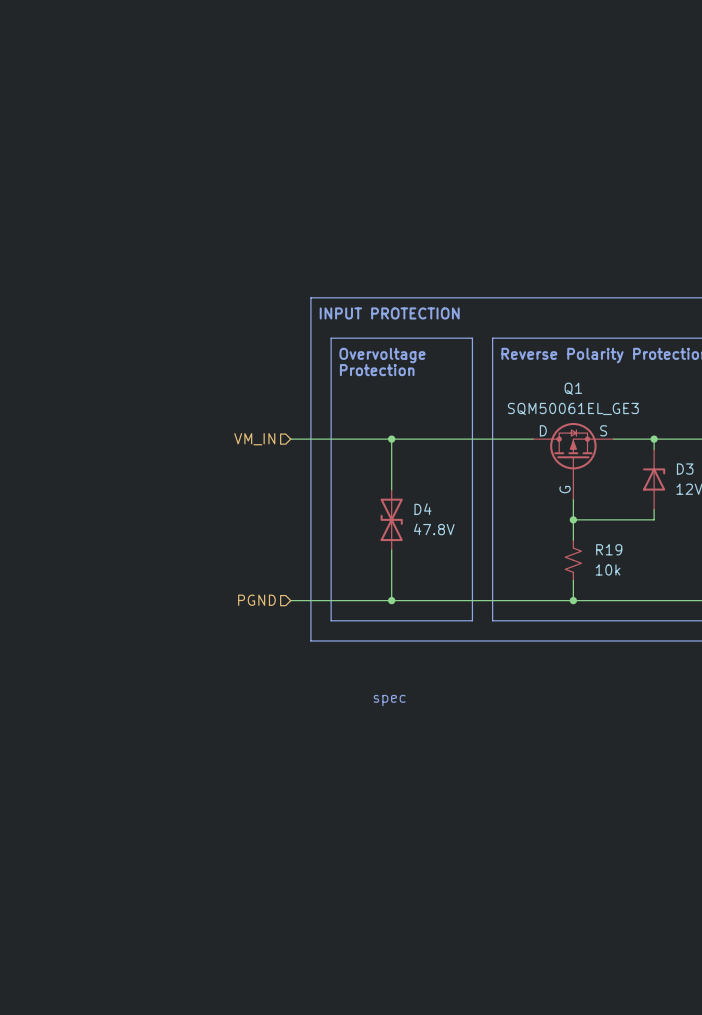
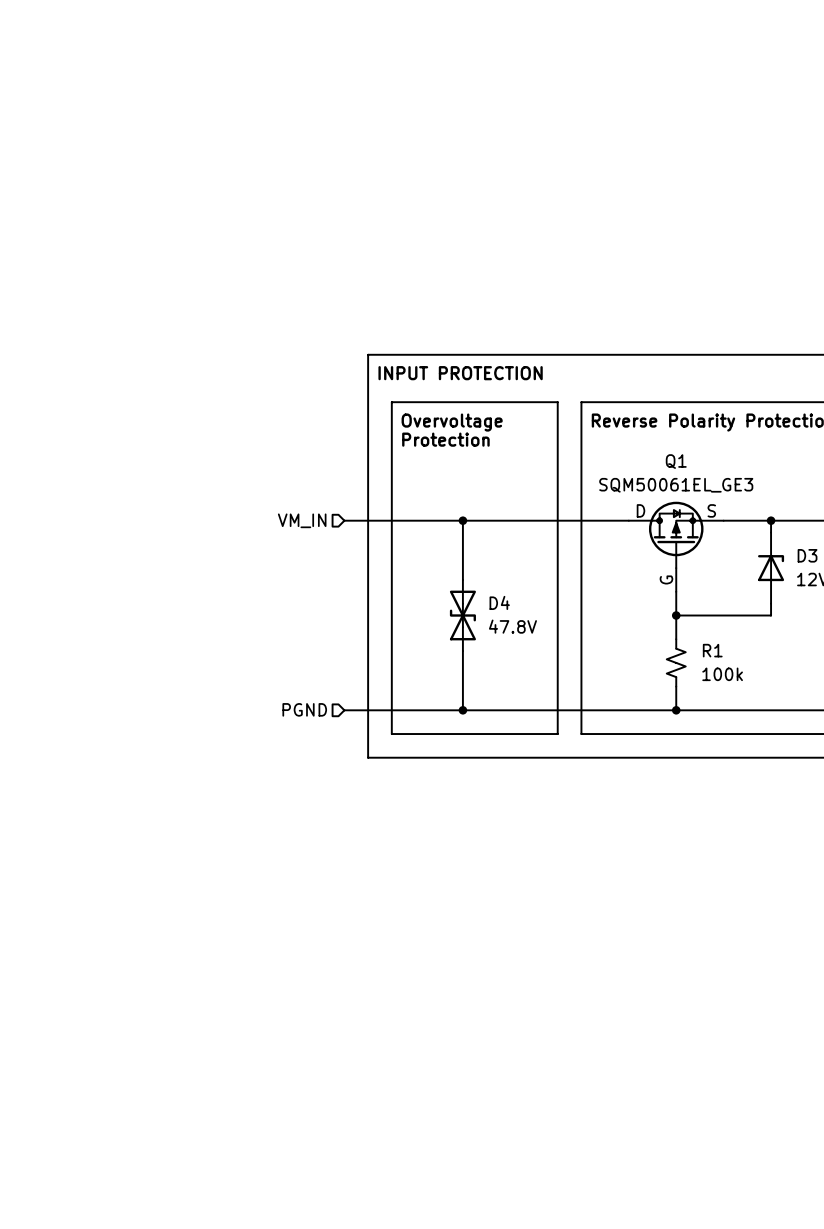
R19 name: R19 (609, 549) -> R1 (712, 650)
R19 value: 10k (608, 569) -> 100k (722, 674)
text: spec (389, 700) -> none

